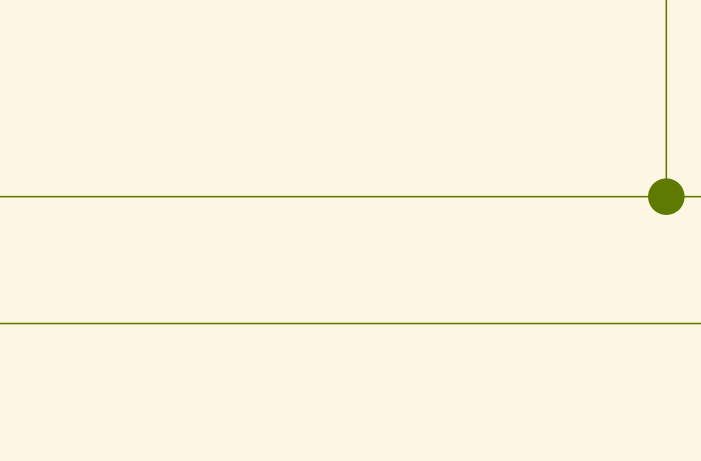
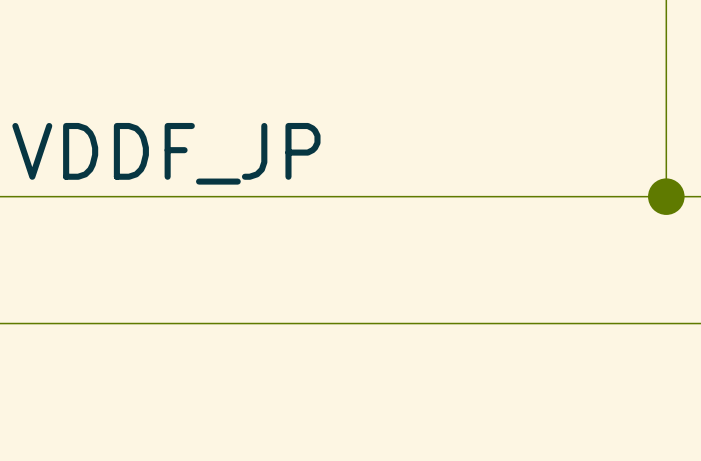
label: none -> VDDF_JP (166, 153)

